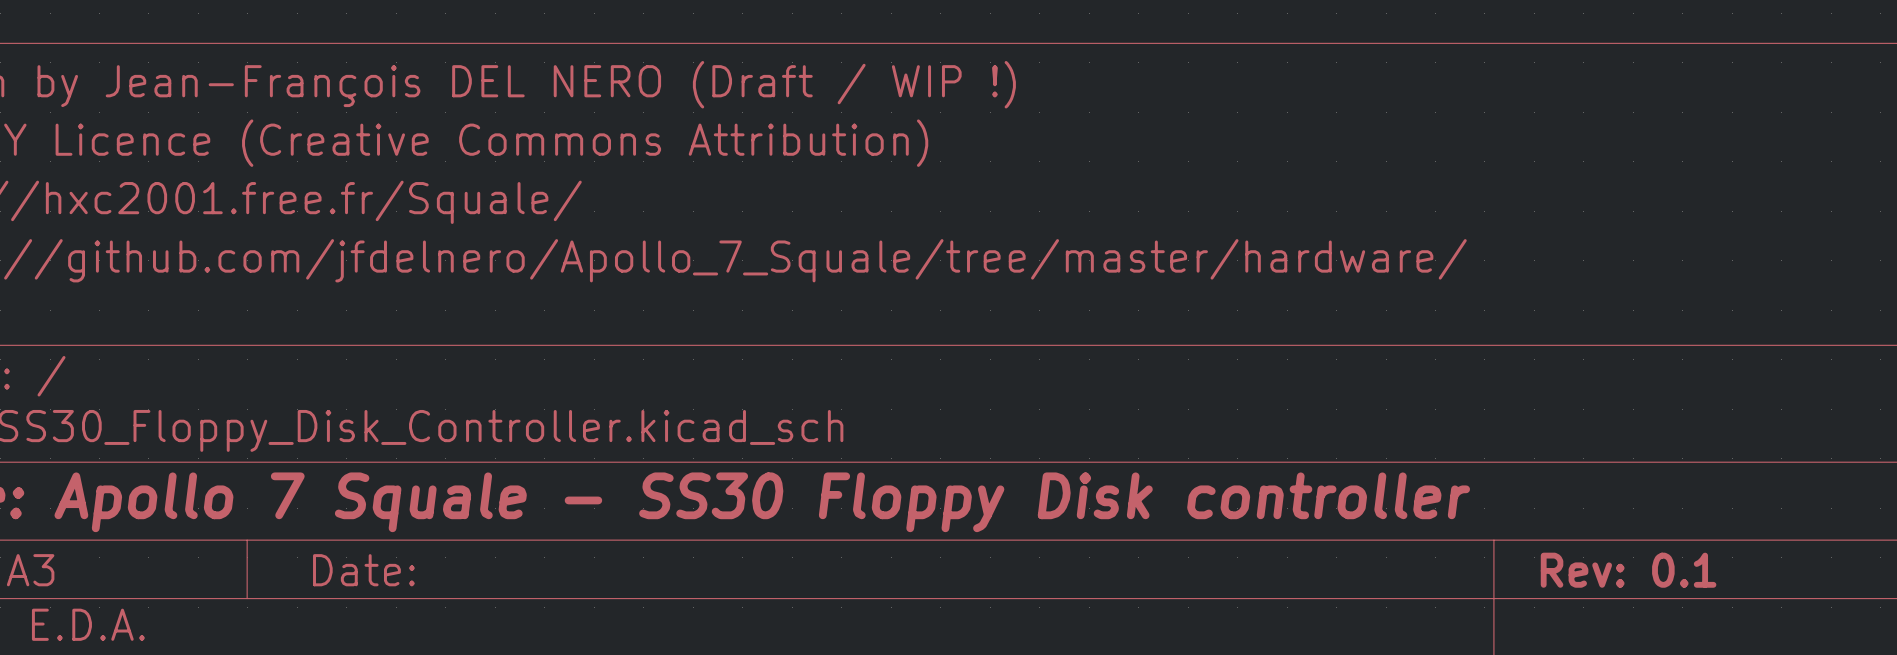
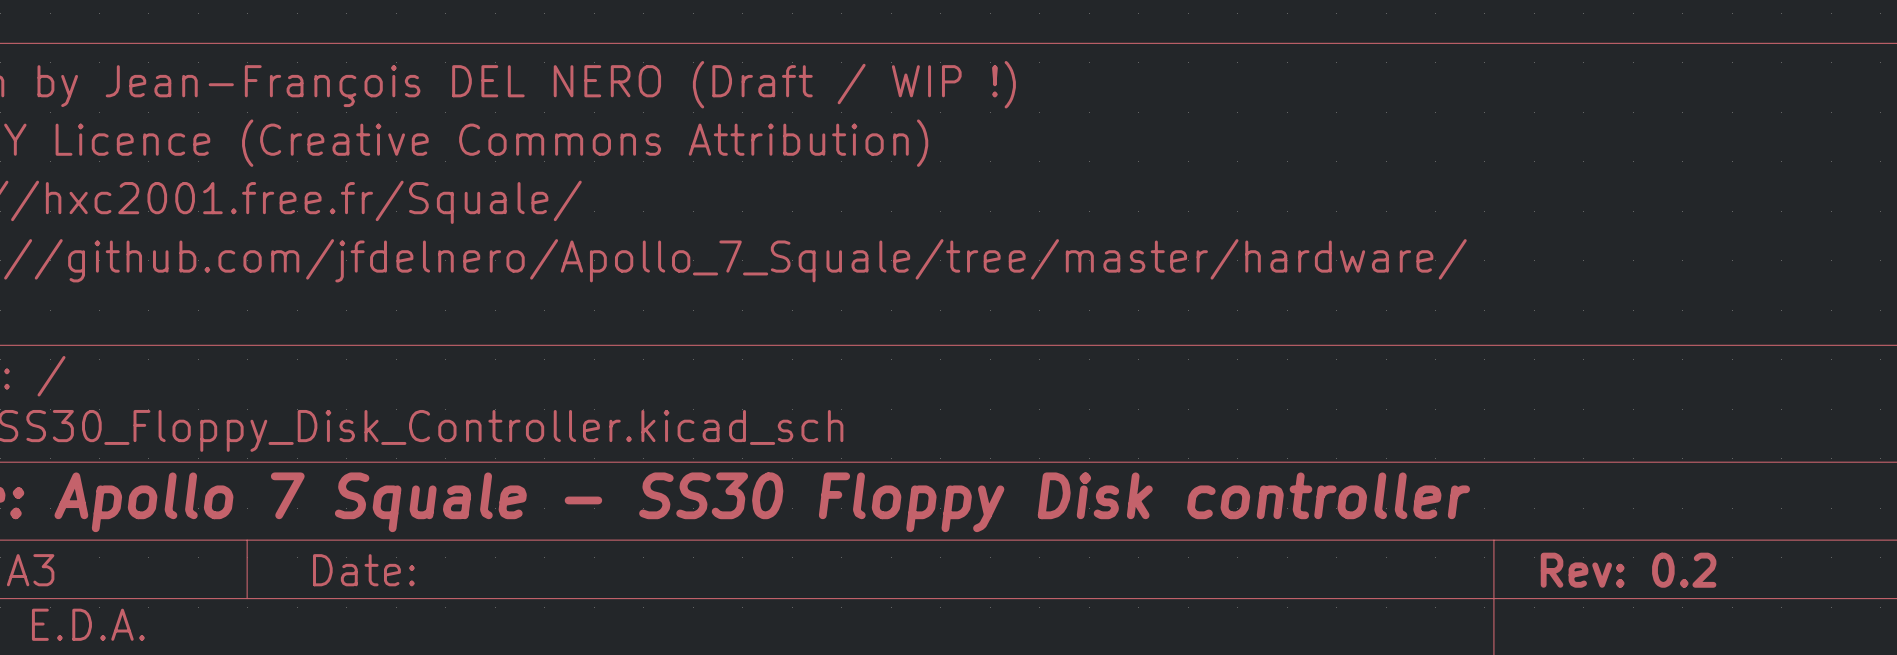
title block: Rev: 0.1 (1628, 570) -> Rev: 0.2 (1628, 570)

